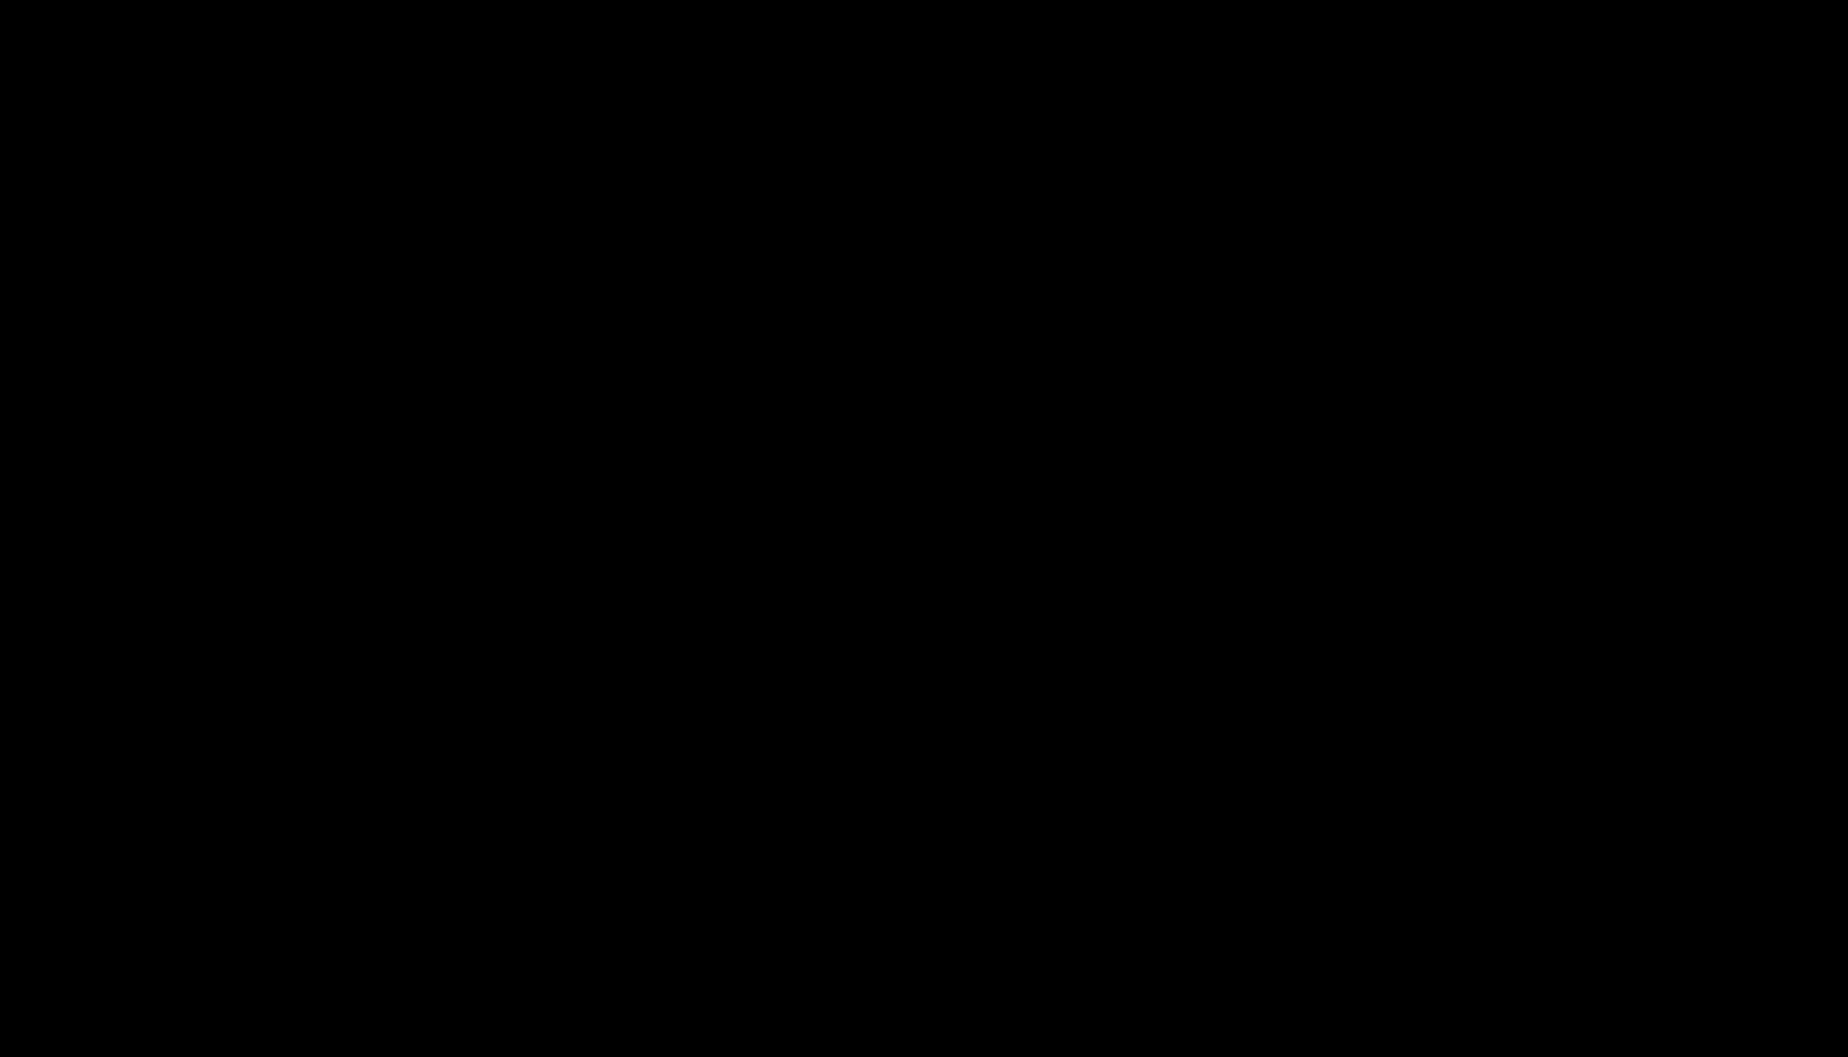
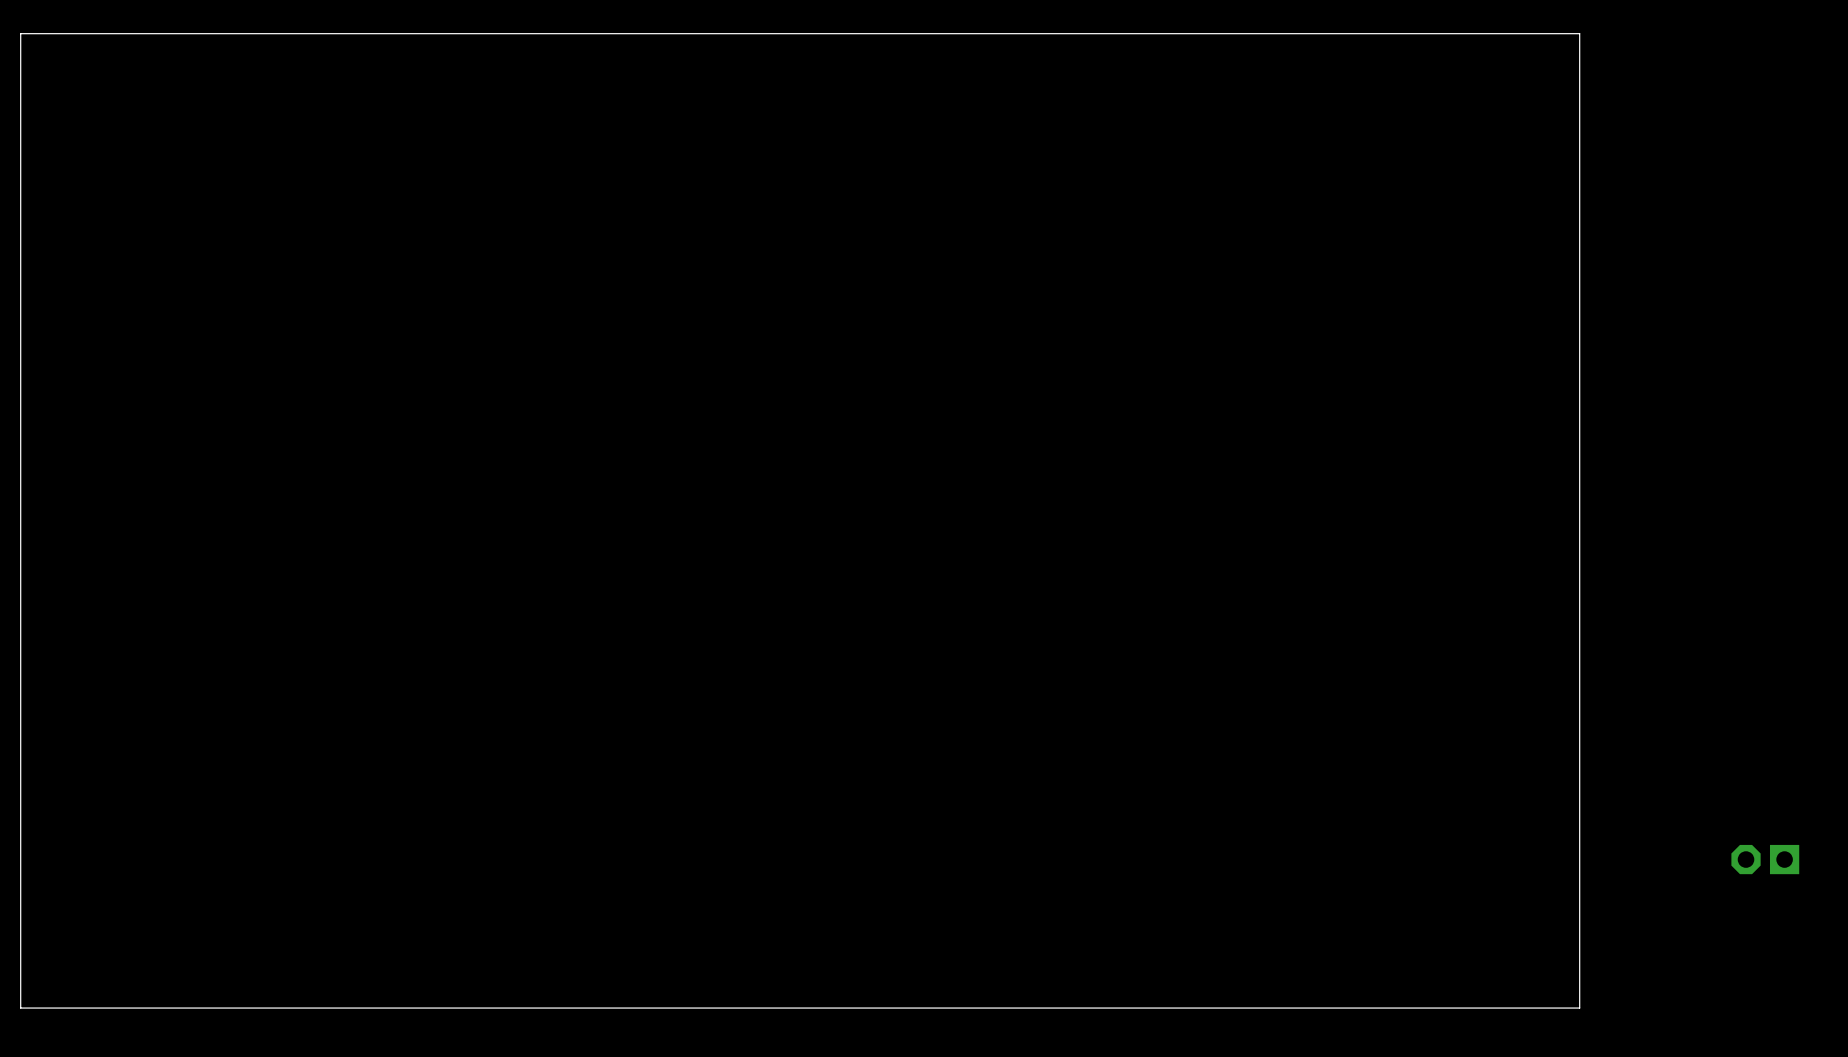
board edge: none -> (1579, 33) (20, 33) (20, 1008) (1579, 1008) (1579, 33)
part: none -> (1765, 859)

